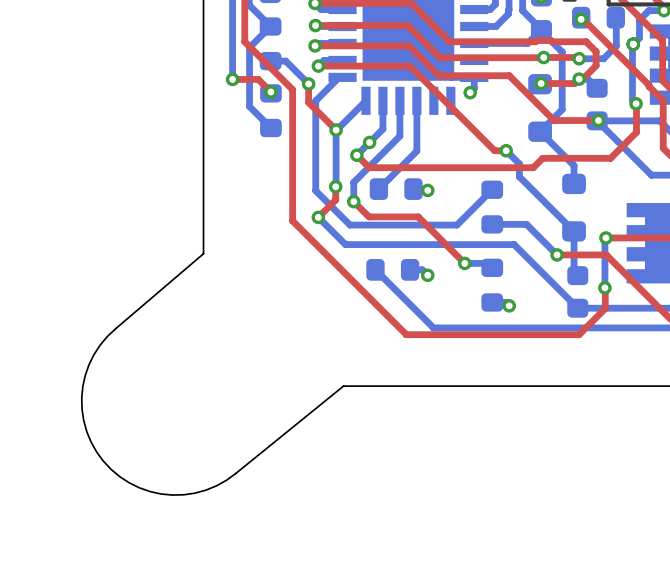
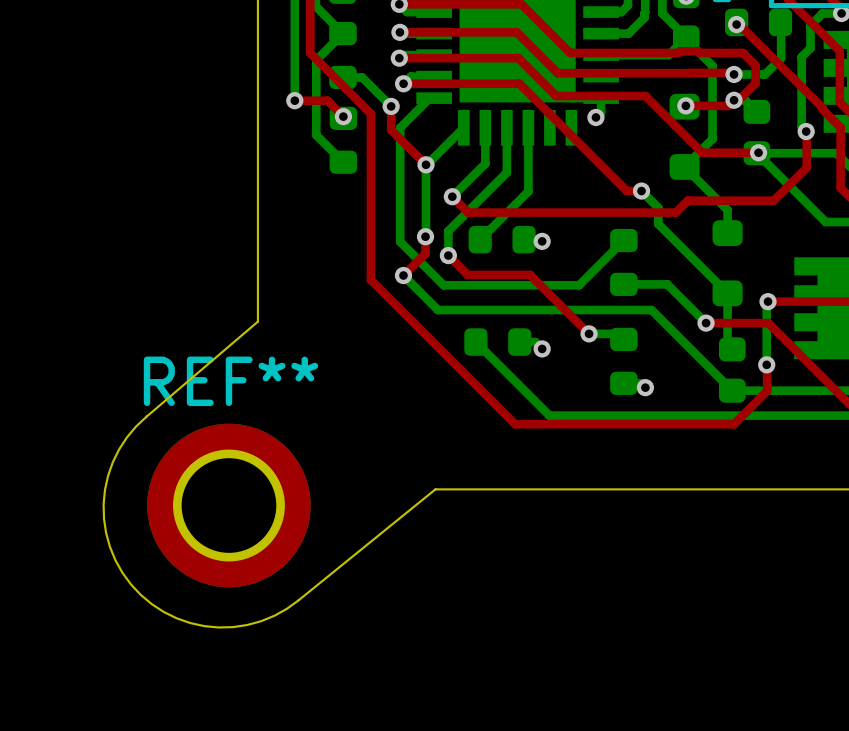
via: (633, 44) -> none
via: (543, 57) -> none
via: (369, 142) -> none
REF**: none -> (228, 505)

